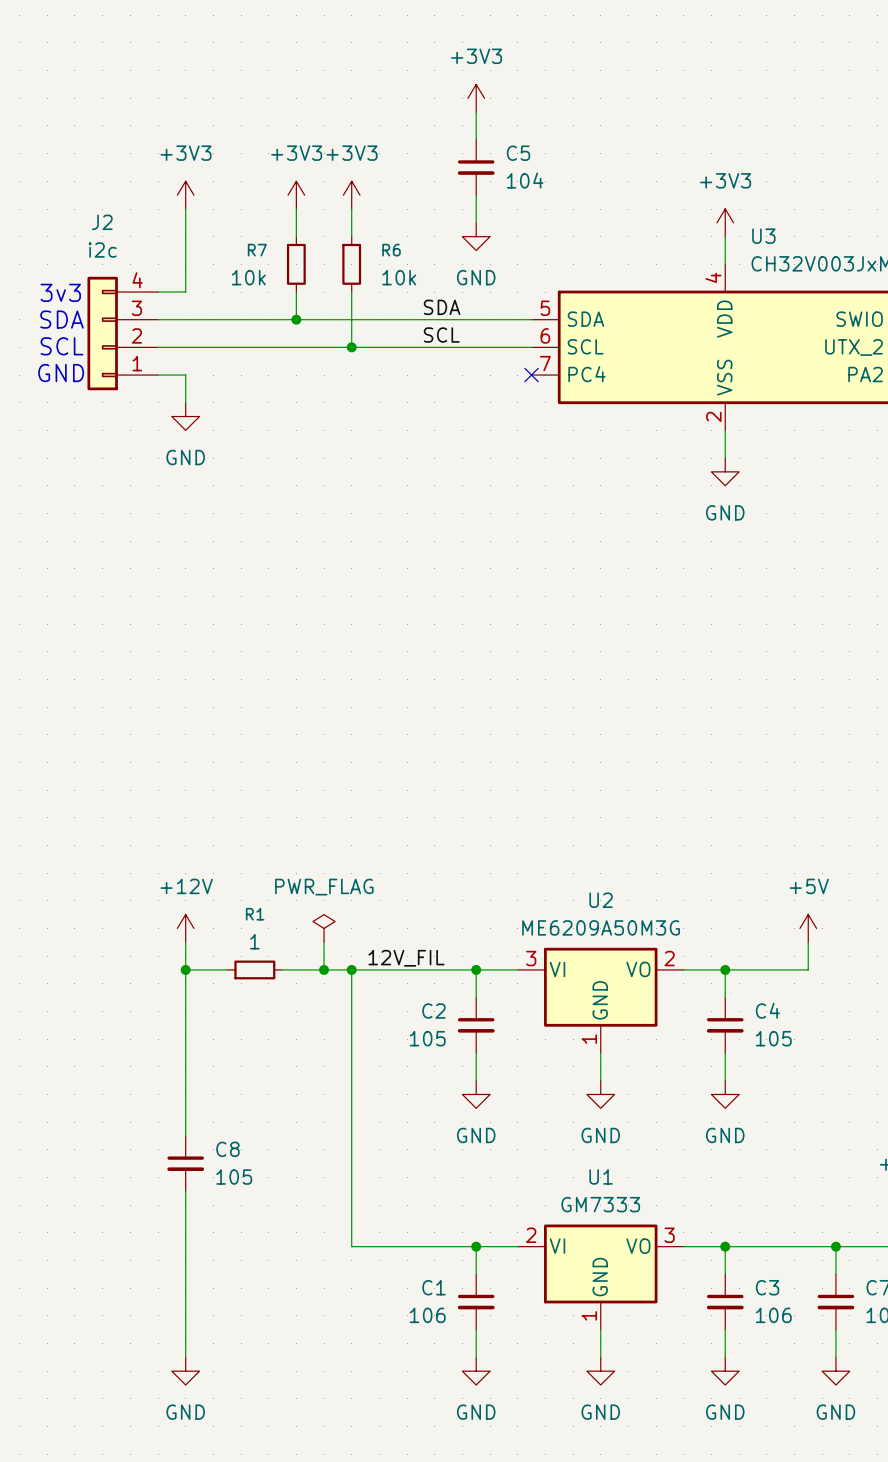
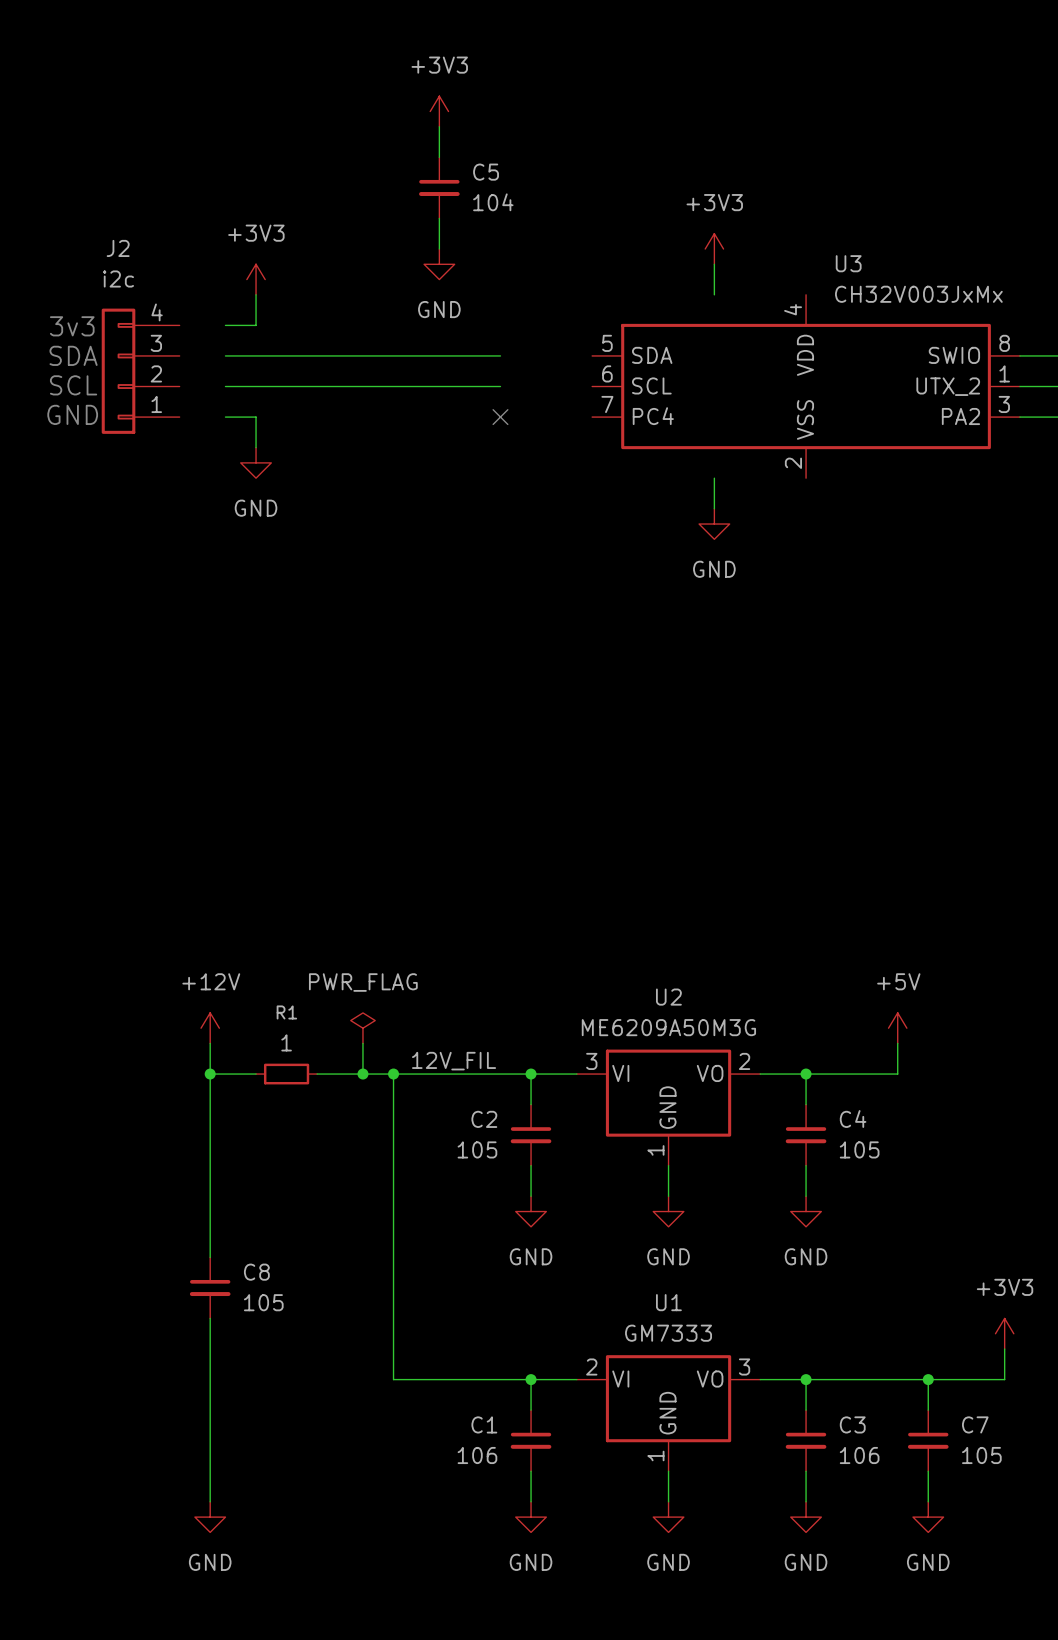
power symbol: none -> +3V3 (439, 111)
power symbol: +3V3 (476, 98) -> none
wire: (476, 112) (476, 139) -> (439, 126) (439, 157)
C5 position: (476, 167) -> (439, 187)
power symbol: +3V3 (185, 195) -> none
power symbol: +3V3 (296, 195) -> none
power symbol: +3V3 (351, 195) -> none
wire: (476, 195) (476, 222) -> (439, 218) (439, 249)
wire: (185, 209) (185, 292) (158, 292) -> none
wire: (296, 209) (296, 236) -> none
wire: (351, 209) (351, 236) -> none
power symbol position: +3V3 (725, 222) -> +3V3 (714, 249)
power symbol position: GND (476, 236) -> GND (439, 264)
wire: (725, 236) (725, 264) -> (714, 264) (714, 294)
power symbol: none -> +3V3 (256, 279)
wire: none -> (256, 294) (256, 325) (225, 325)
R7: 10k (296, 264) -> none
R6: 10k (351, 264) -> none
wire: (296, 292) (296, 319) -> none
wire: (351, 292) (351, 347) -> none
label: SDA (442, 307) -> none
wire: (158, 319) (199, 319) -> none
junction: (296, 319) -> none
wire: (448, 319) (531, 319) -> none
label: SCL (441, 335) -> none
wire: (158, 347) (199, 347) -> none
junction: (351, 347) -> none
wire: (448, 347) (531, 347) -> none
wire: (158, 375) (185, 375) (185, 402) -> (225, 417) (256, 417) (256, 447)
no-connect mark: none -> (500, 417)
no-connect mark: (531, 375) -> none
power symbol position: GND (185, 416) -> GND (256, 462)
wire: (725, 430) (725, 458) -> (714, 478) (714, 508)
power symbol position: GND (725, 471) -> GND (714, 524)

